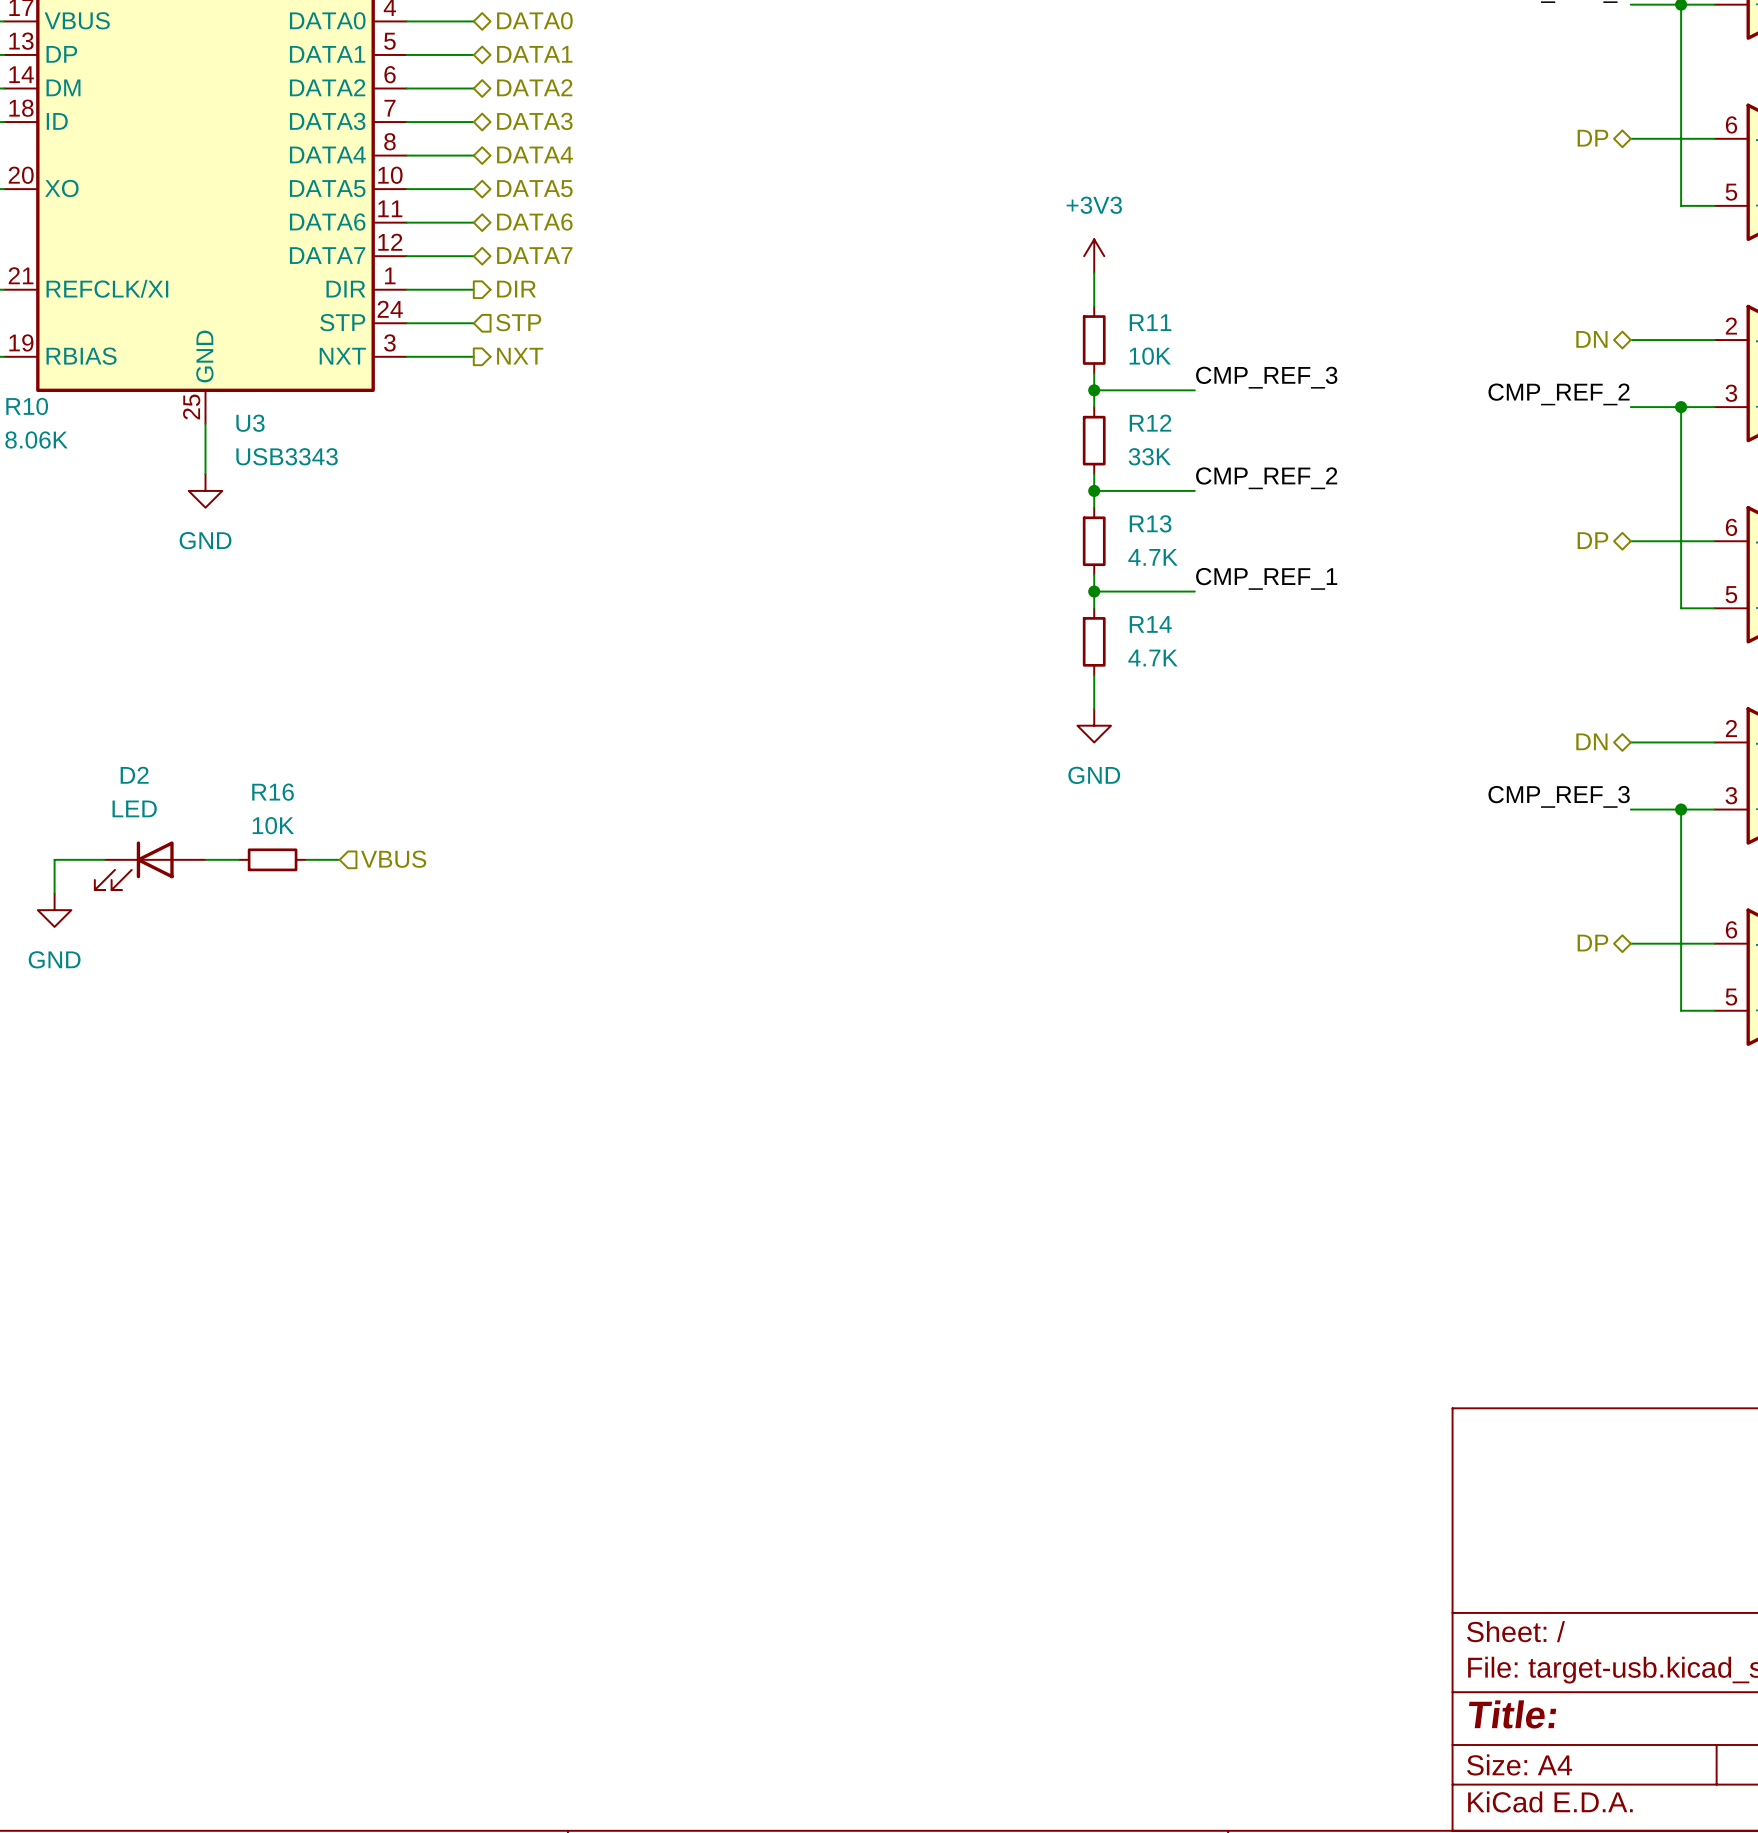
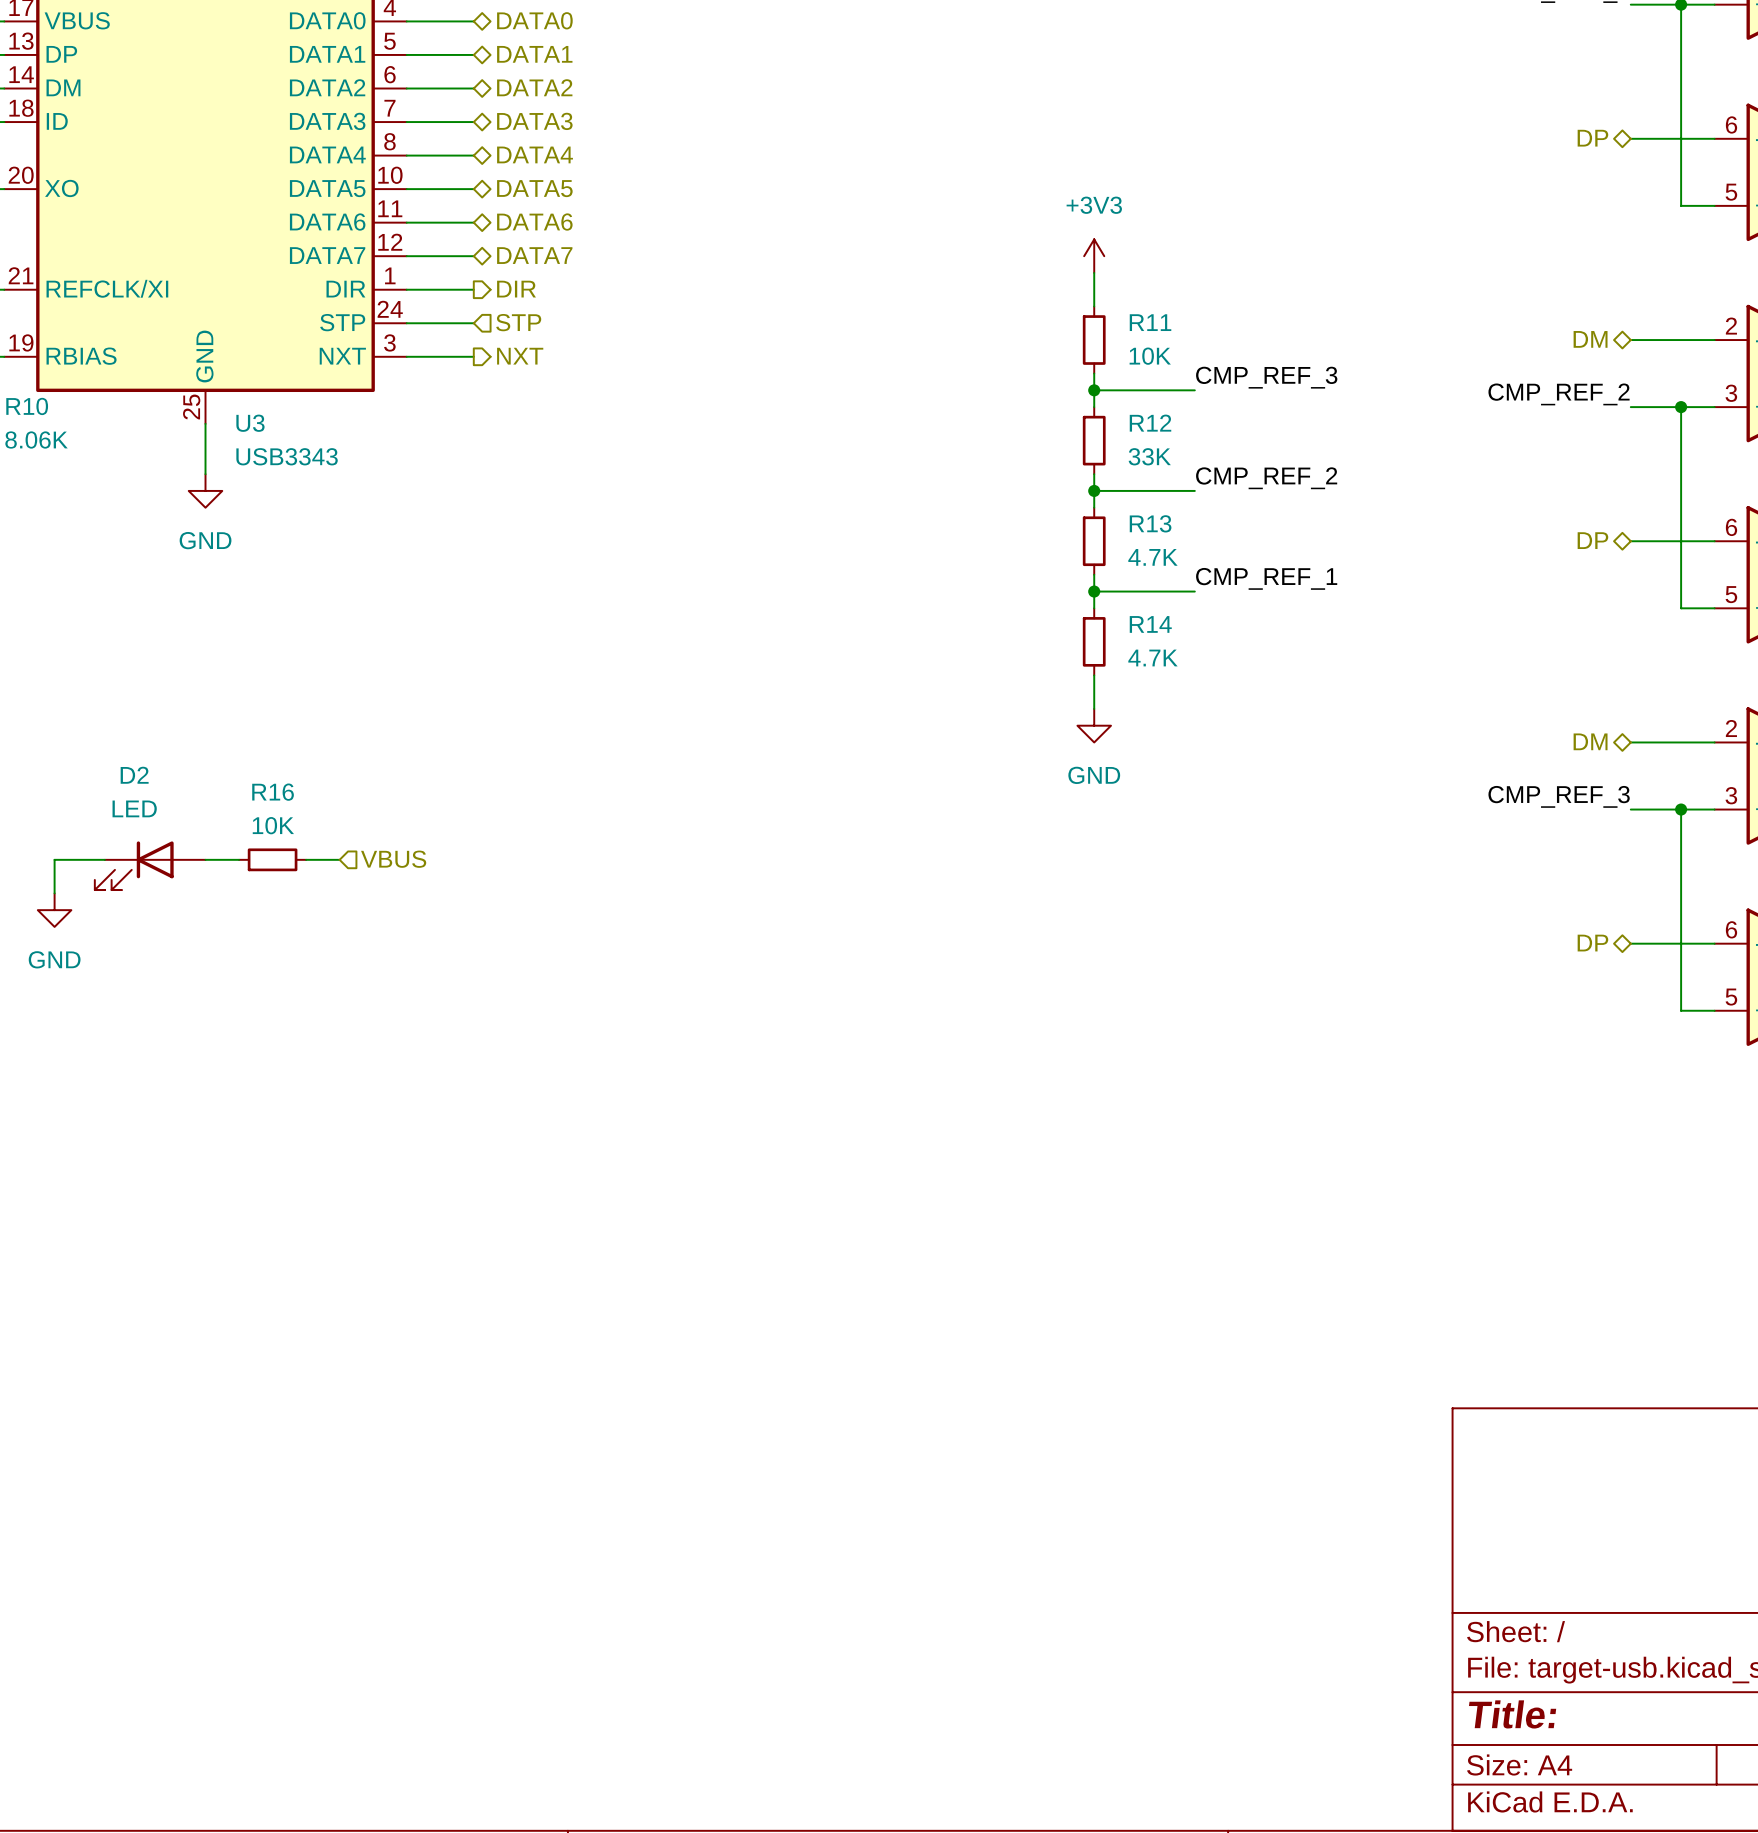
hierarchical label: DN (1591, 339) -> DM (1590, 339)
hierarchical label: DN (1591, 741) -> DM (1590, 741)

